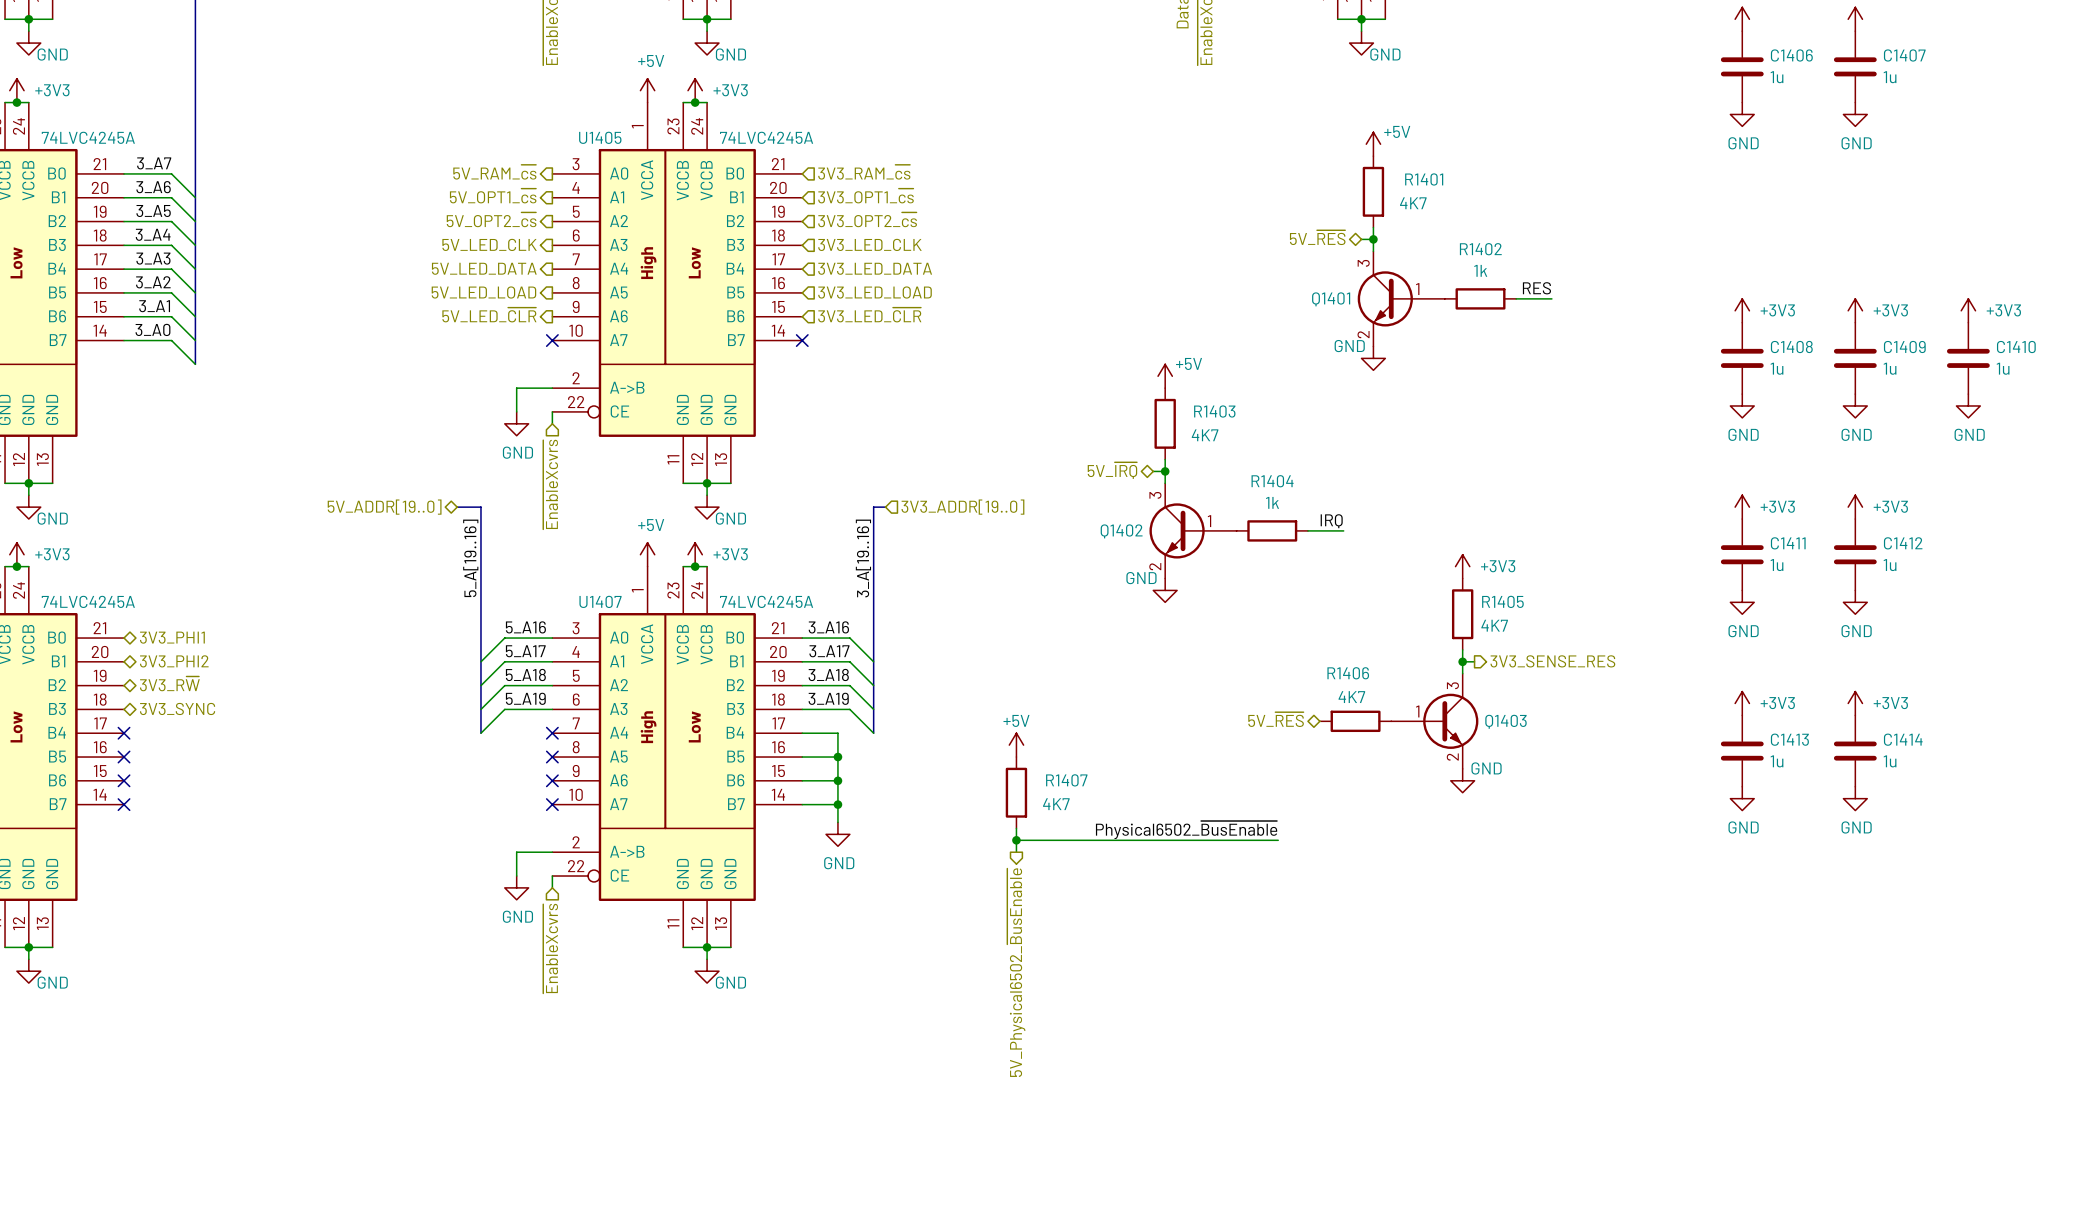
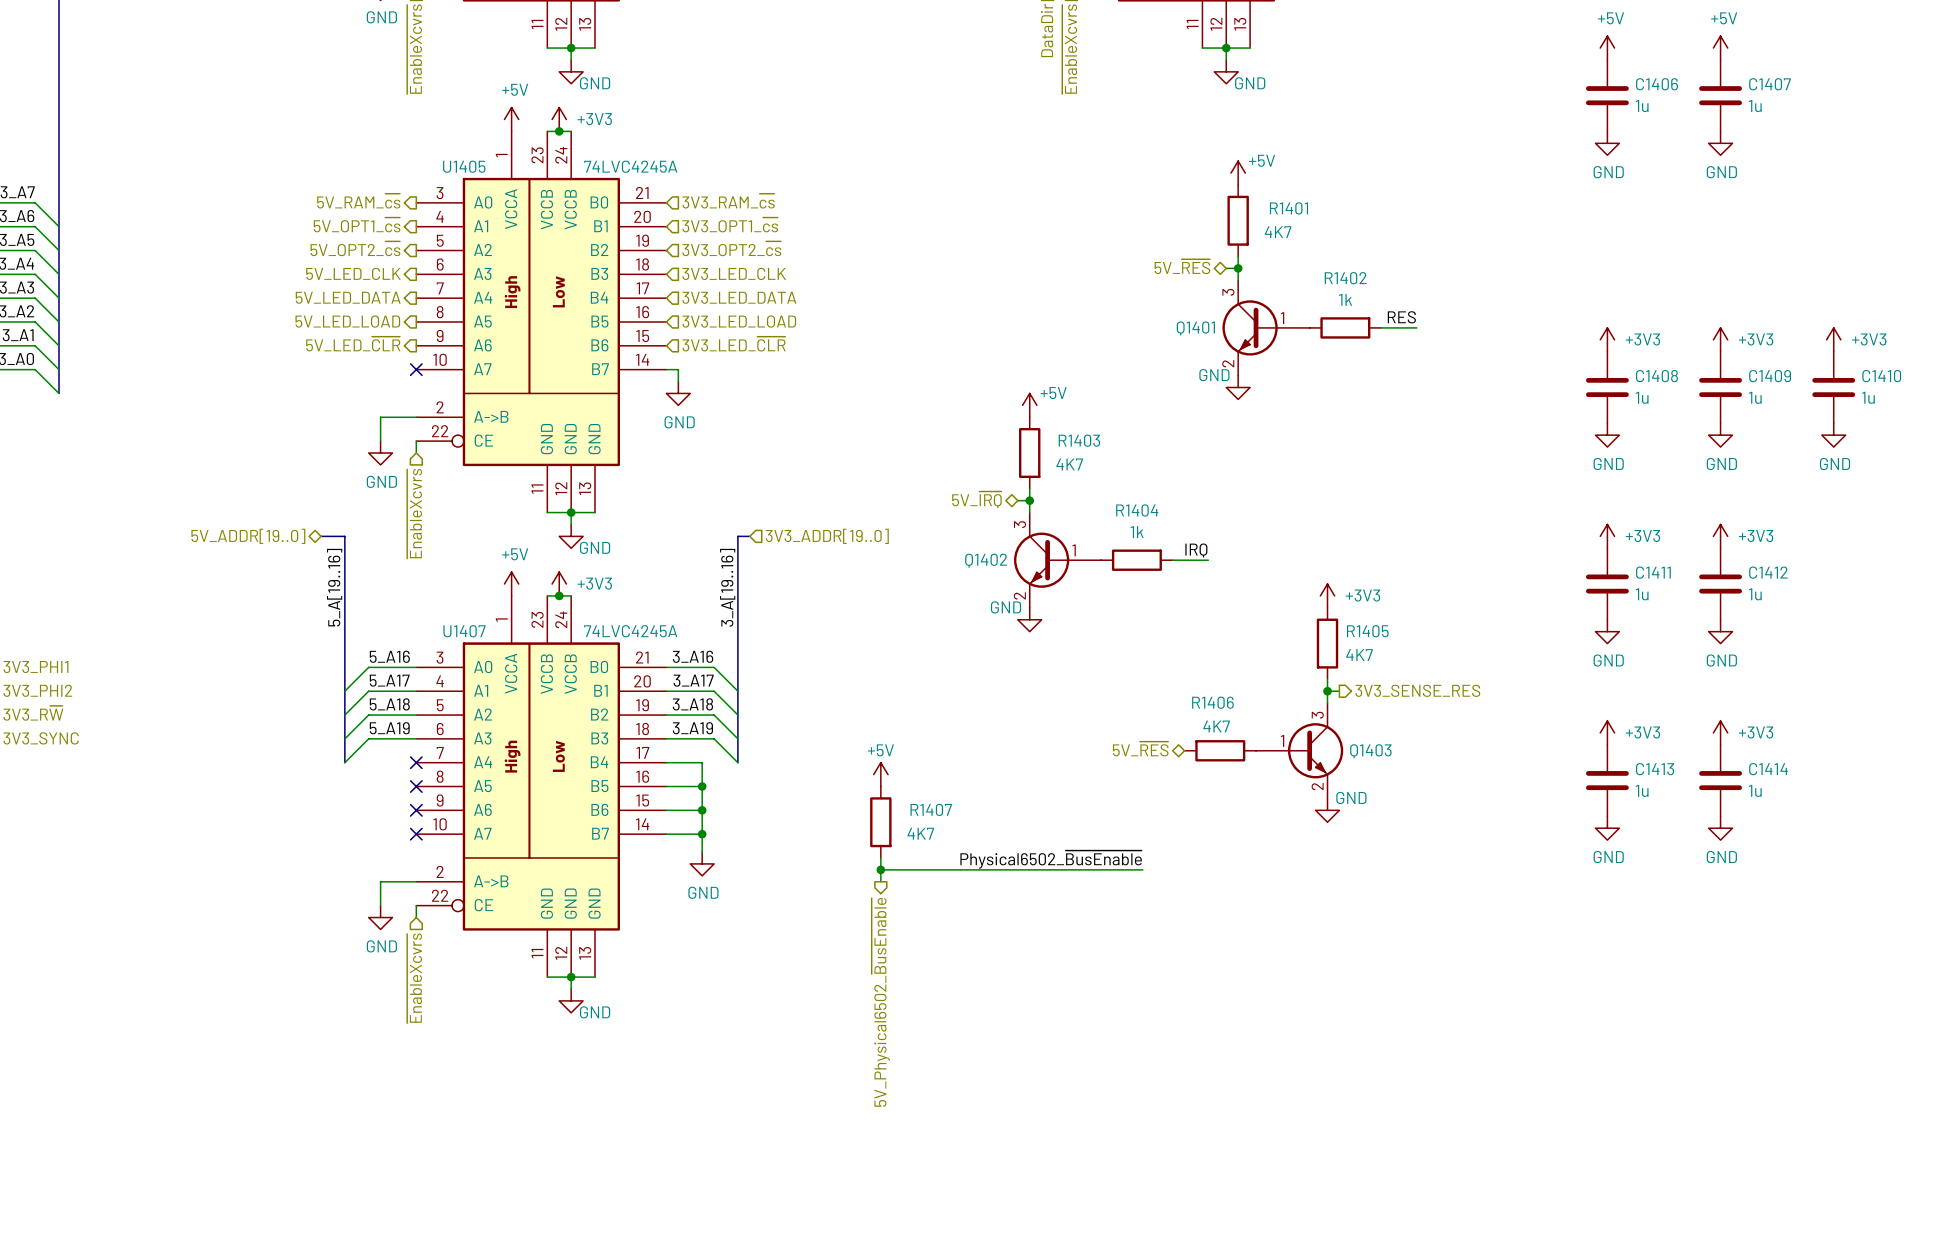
wire: none -> (666, 369) (678, 369) (678, 381)
no-connect mark: (802, 340) -> none
power symbol: none -> GND (678, 393)

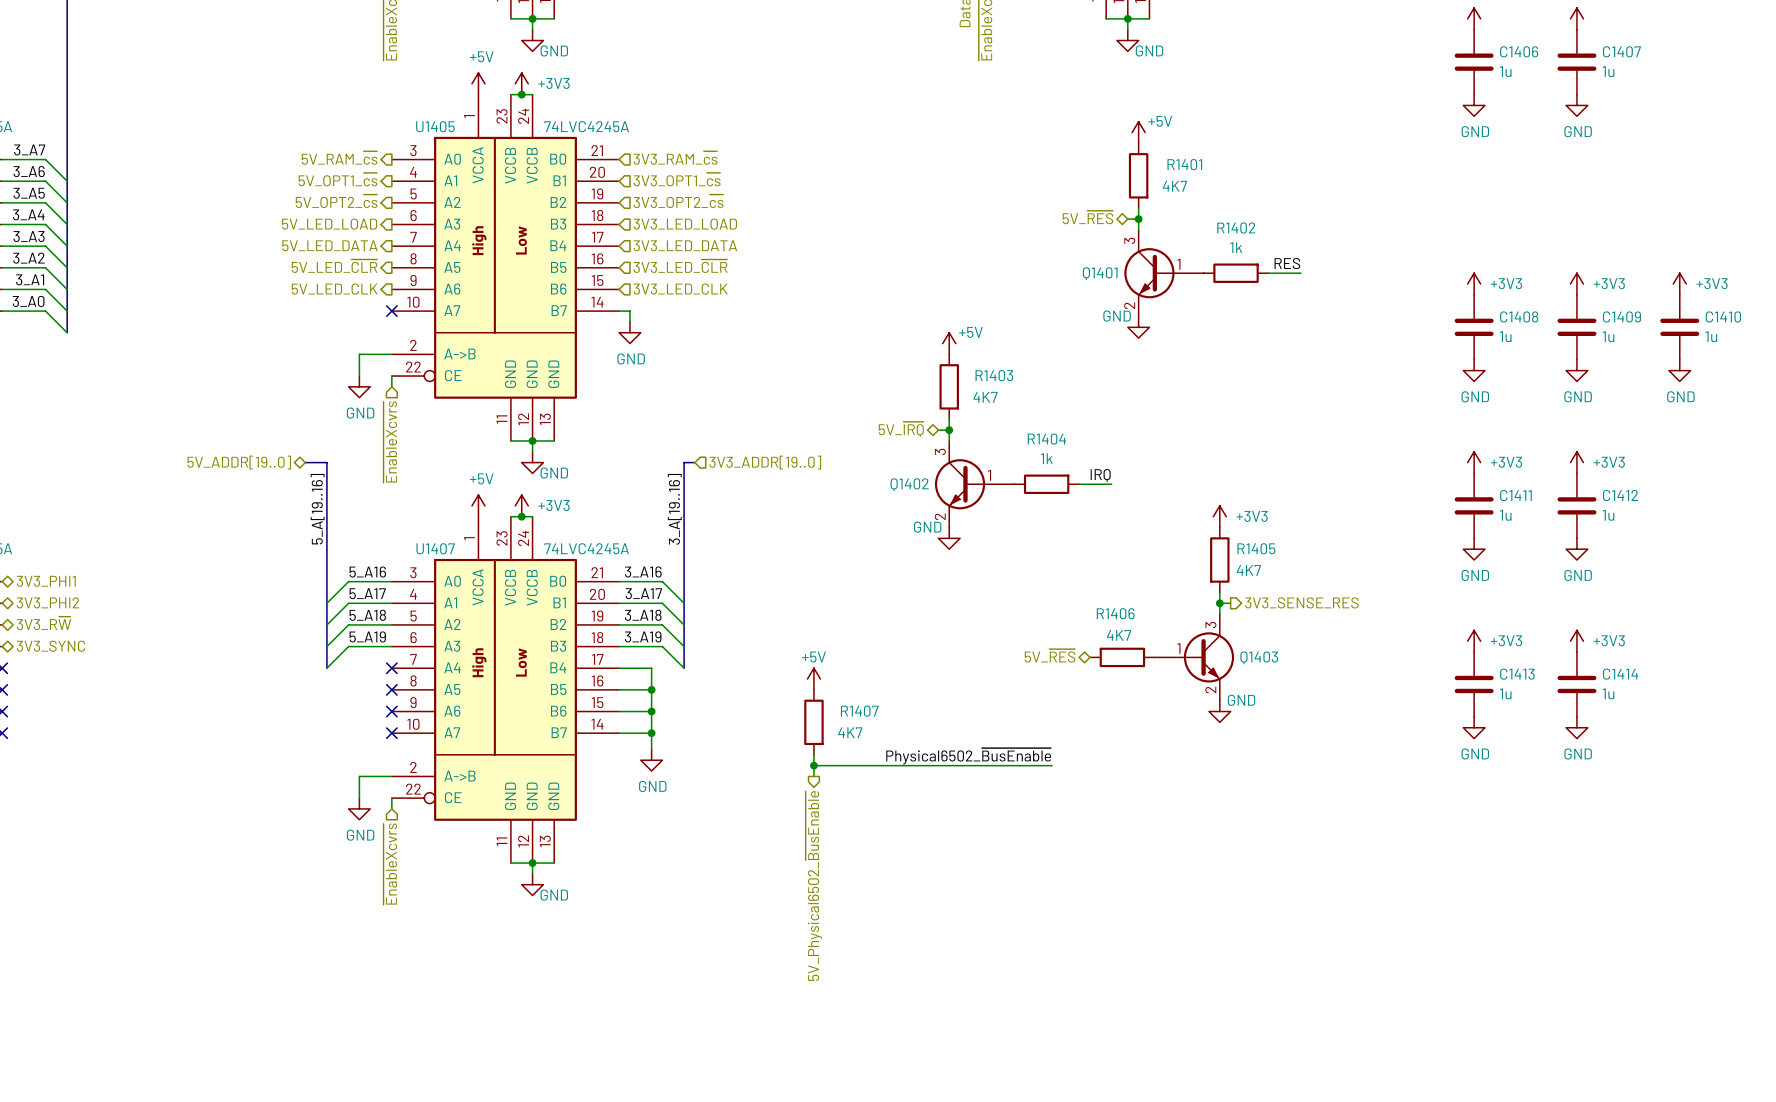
hierarchical label: 5V_LED_CLK (353, 273) -> 5V_LED_LOAD (329, 224)
hierarchical label: 3V3_LED_CLK (734, 273) -> 3V3_LED_LOAD (685, 224)
hierarchical label: 5V_LED_LOAD (347, 321) -> 5V_LED_~{CLR} (334, 266)
hierarchical label: 3V3_LED_LOAD (739, 321) -> 3V3_LED_~{CLR} (680, 266)
hierarchical label: 5V_LED_~{CLR} (353, 344) -> 5V_LED_CLK (334, 289)
hierarchical label: 3V3_LED_~{CLR} (734, 344) -> 3V3_LED_CLK (680, 289)

